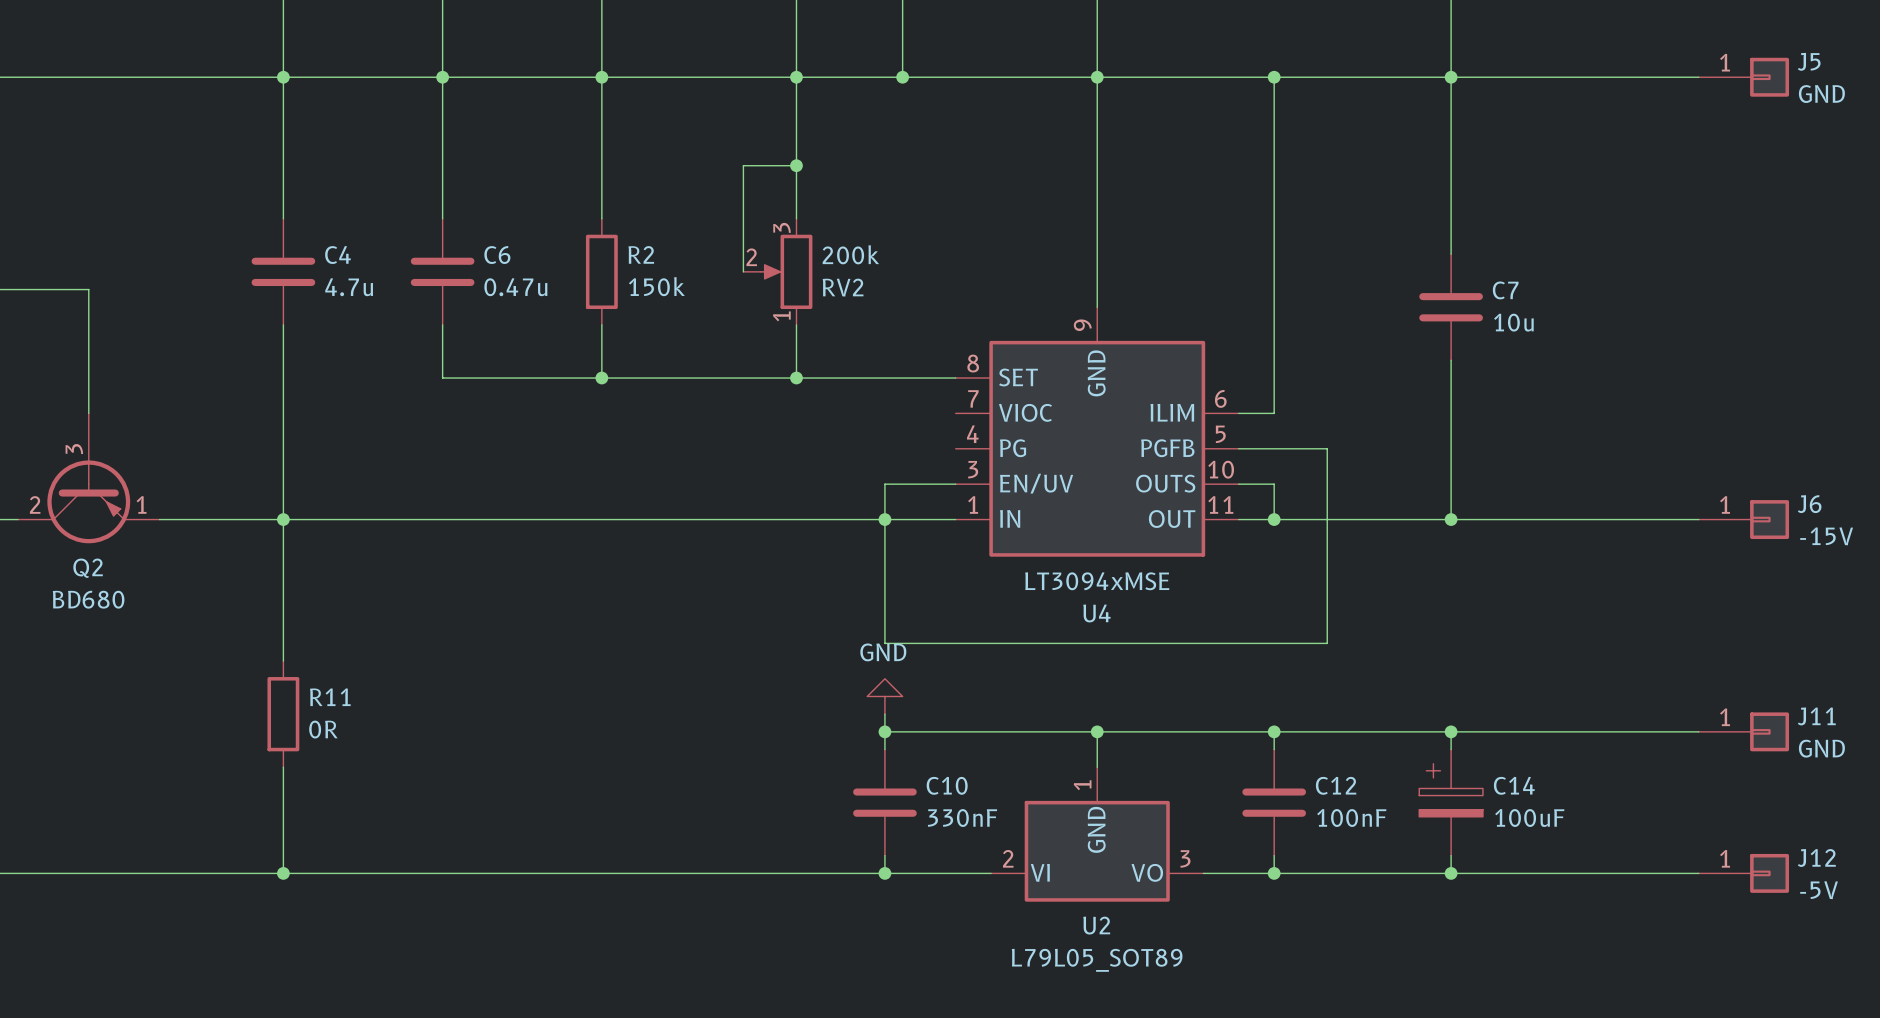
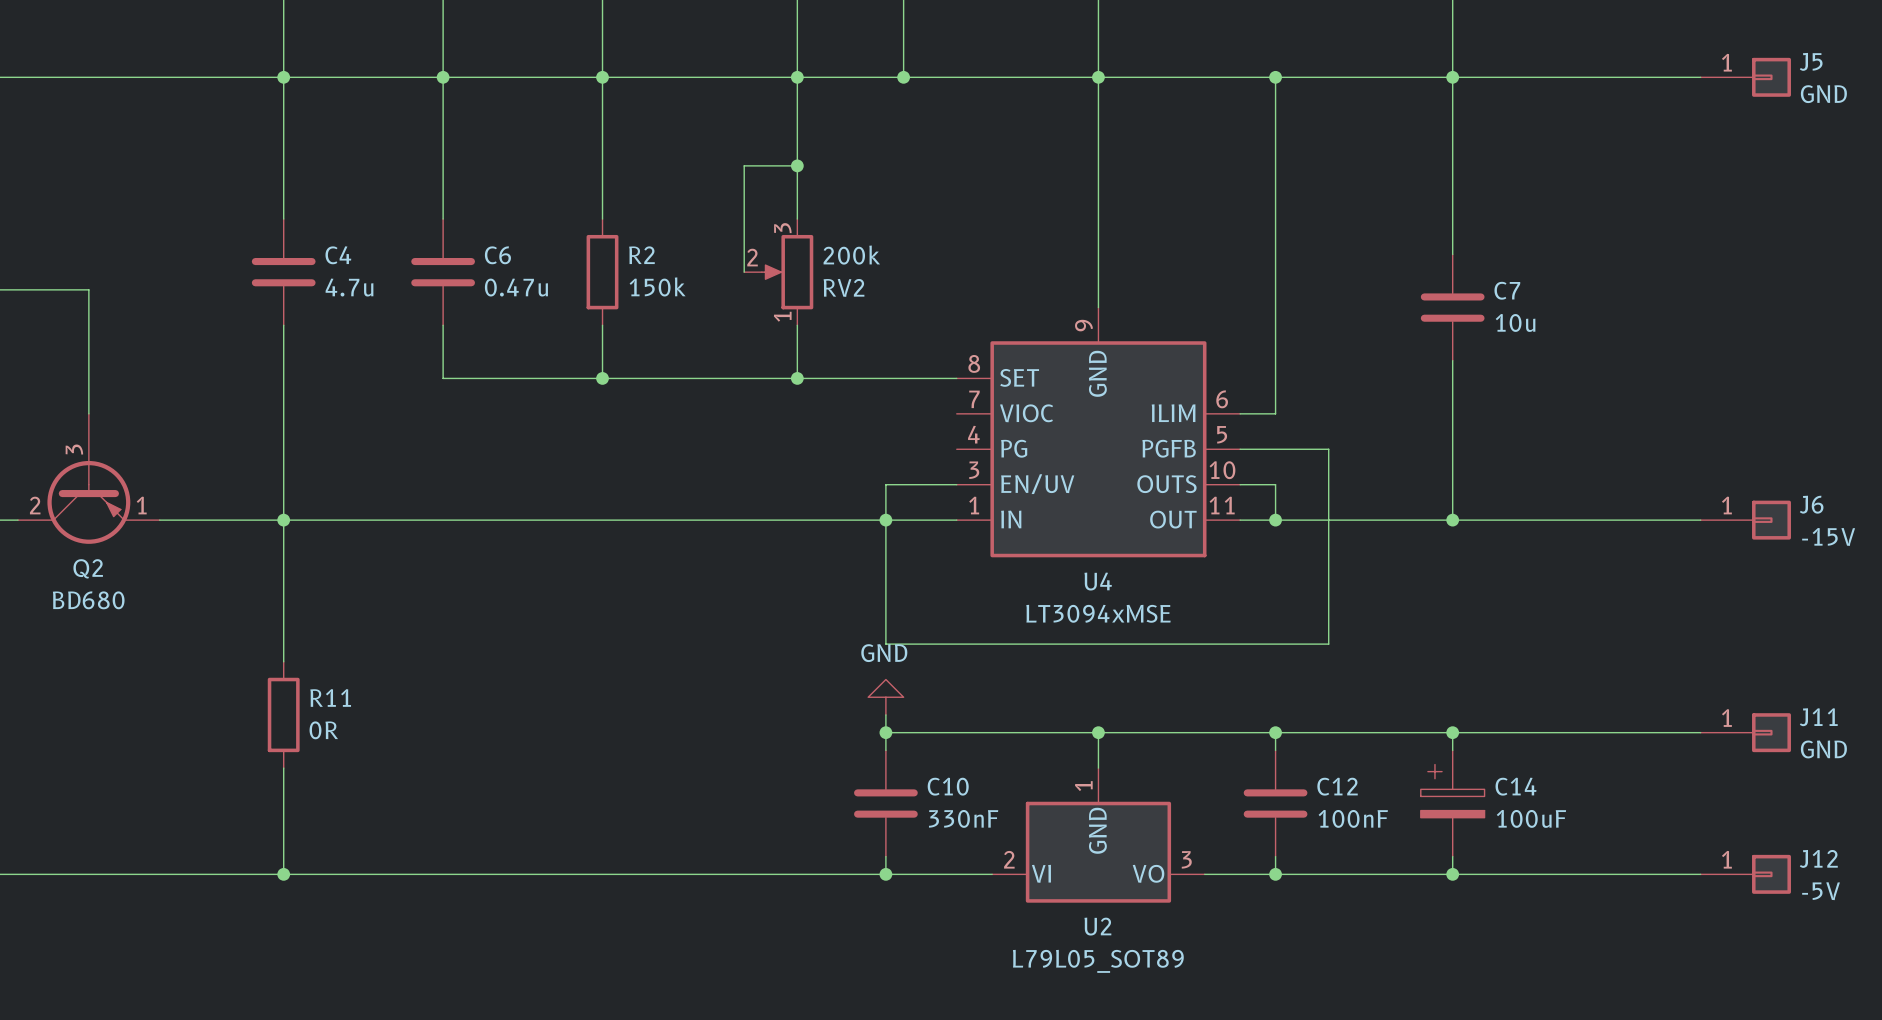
U4 value position: LT3094xMSE (1097, 581) -> LT3094xMSE (1098, 613)
U4 name position: U4 (1096, 613) -> U4 (1098, 581)

